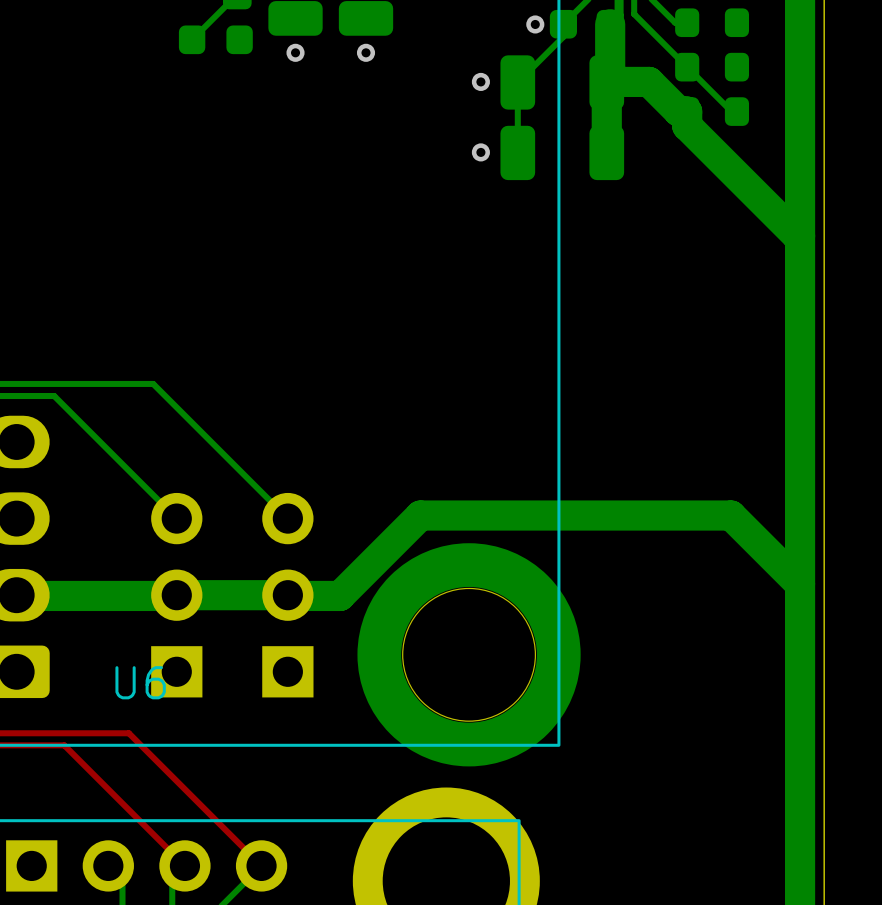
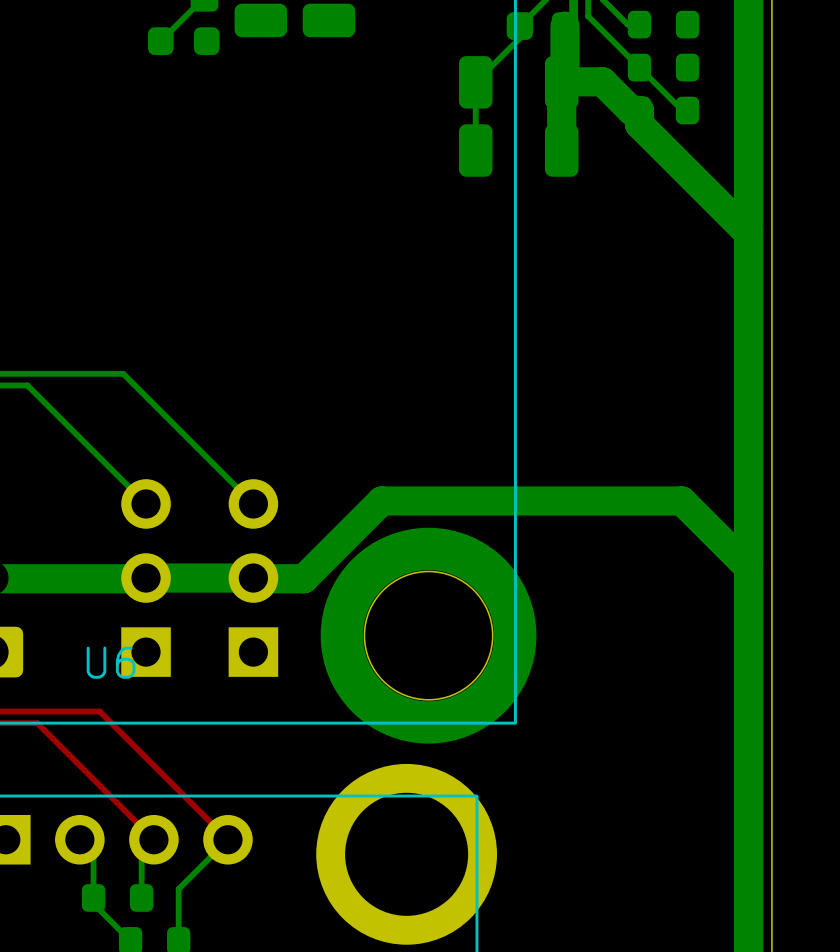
via: (535, 24) -> none
via: (295, 52) -> none
via: (366, 52) -> none
via: (480, 81) -> none
via: (480, 152) -> none

